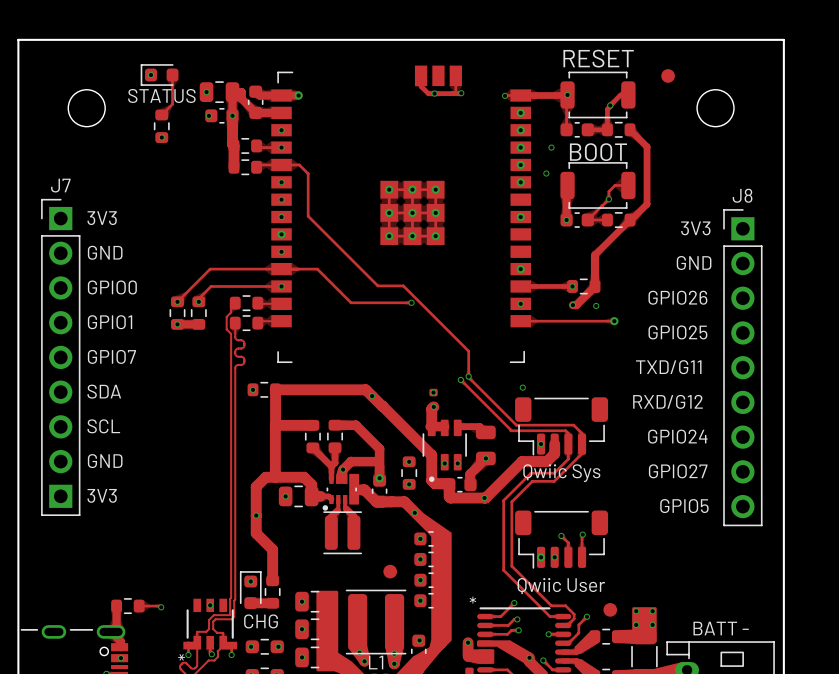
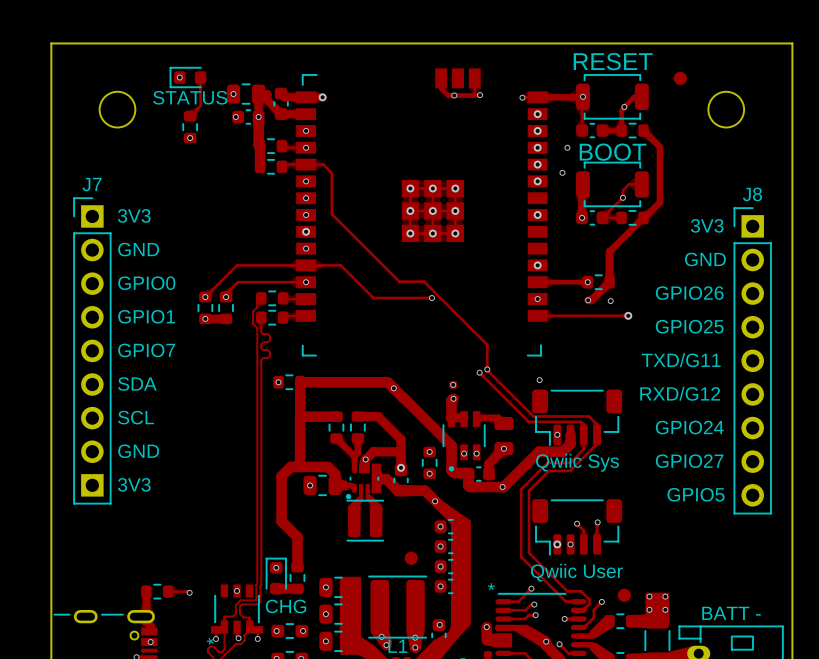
via: (256, 515) -> none

